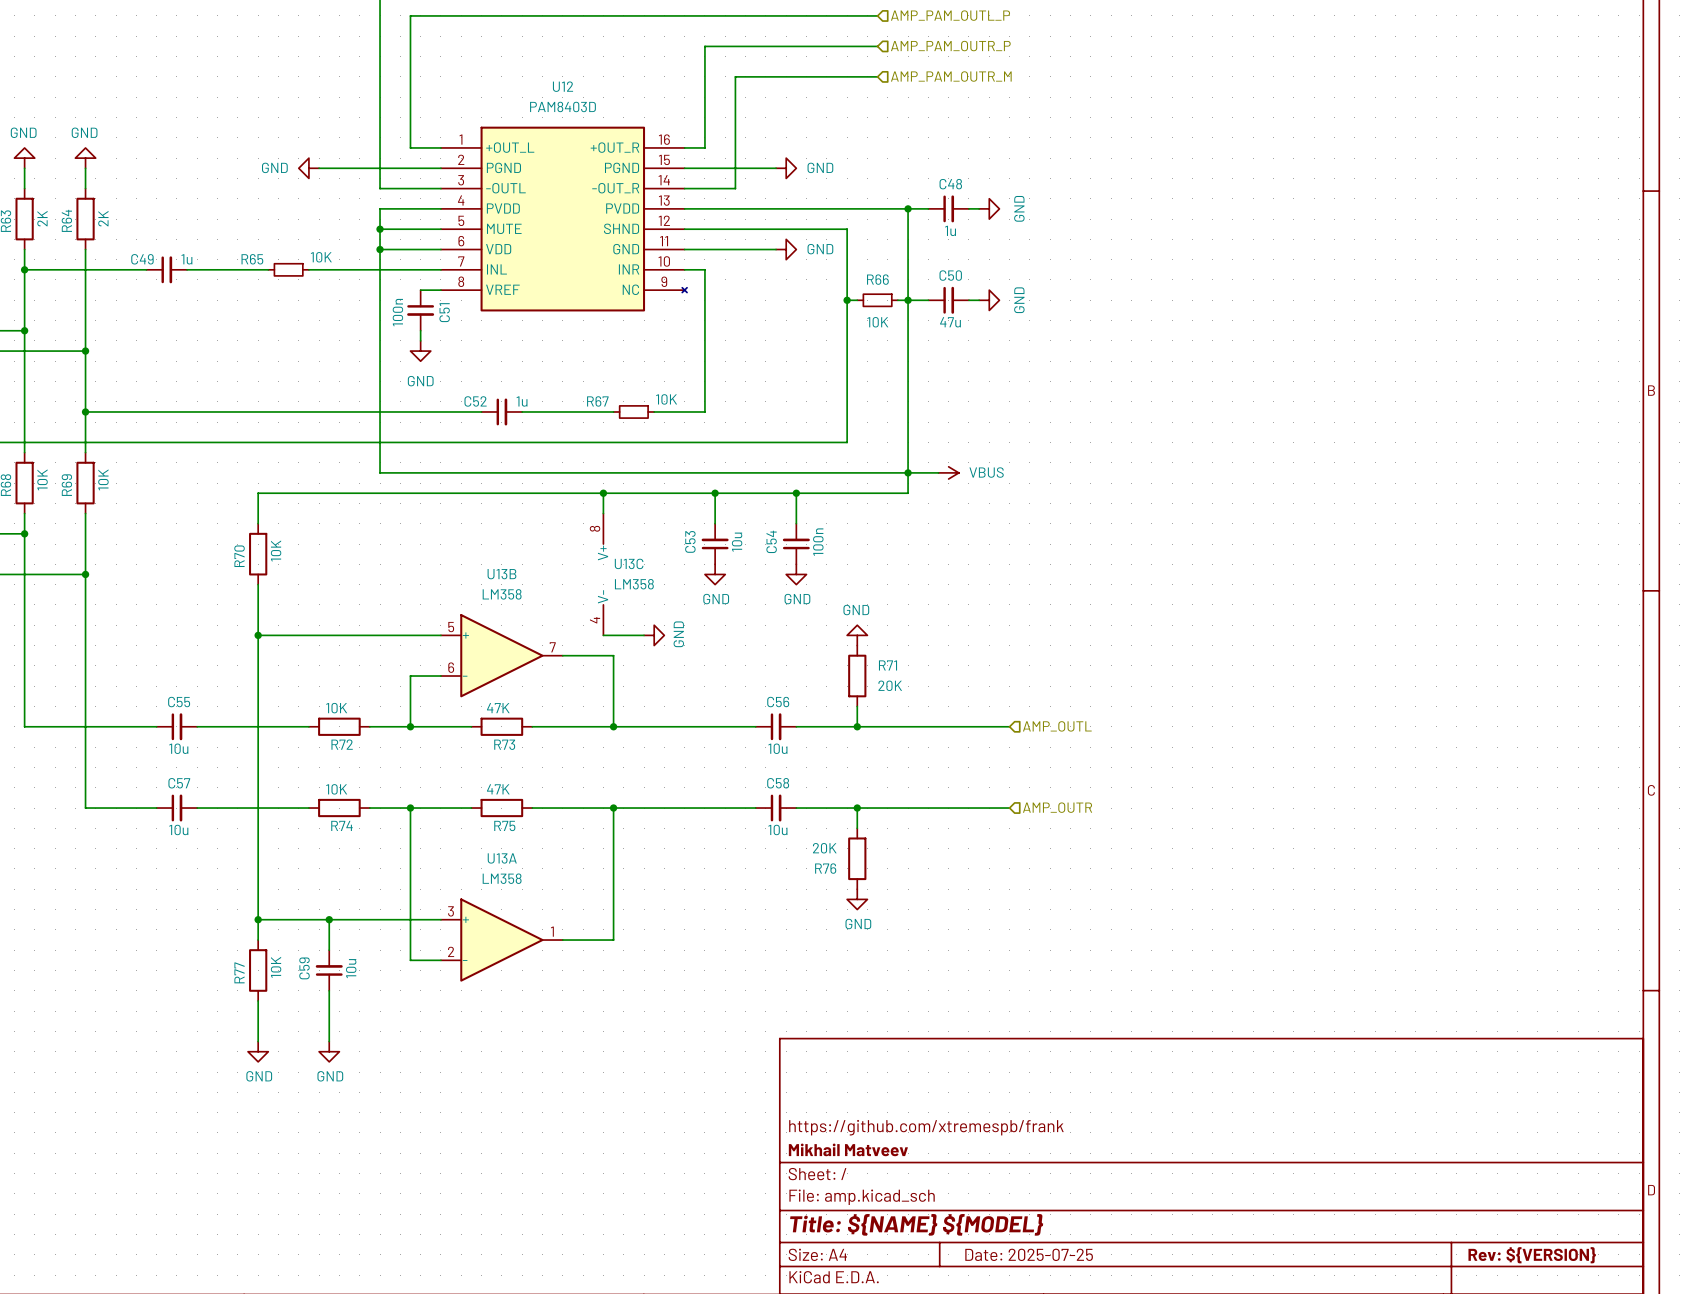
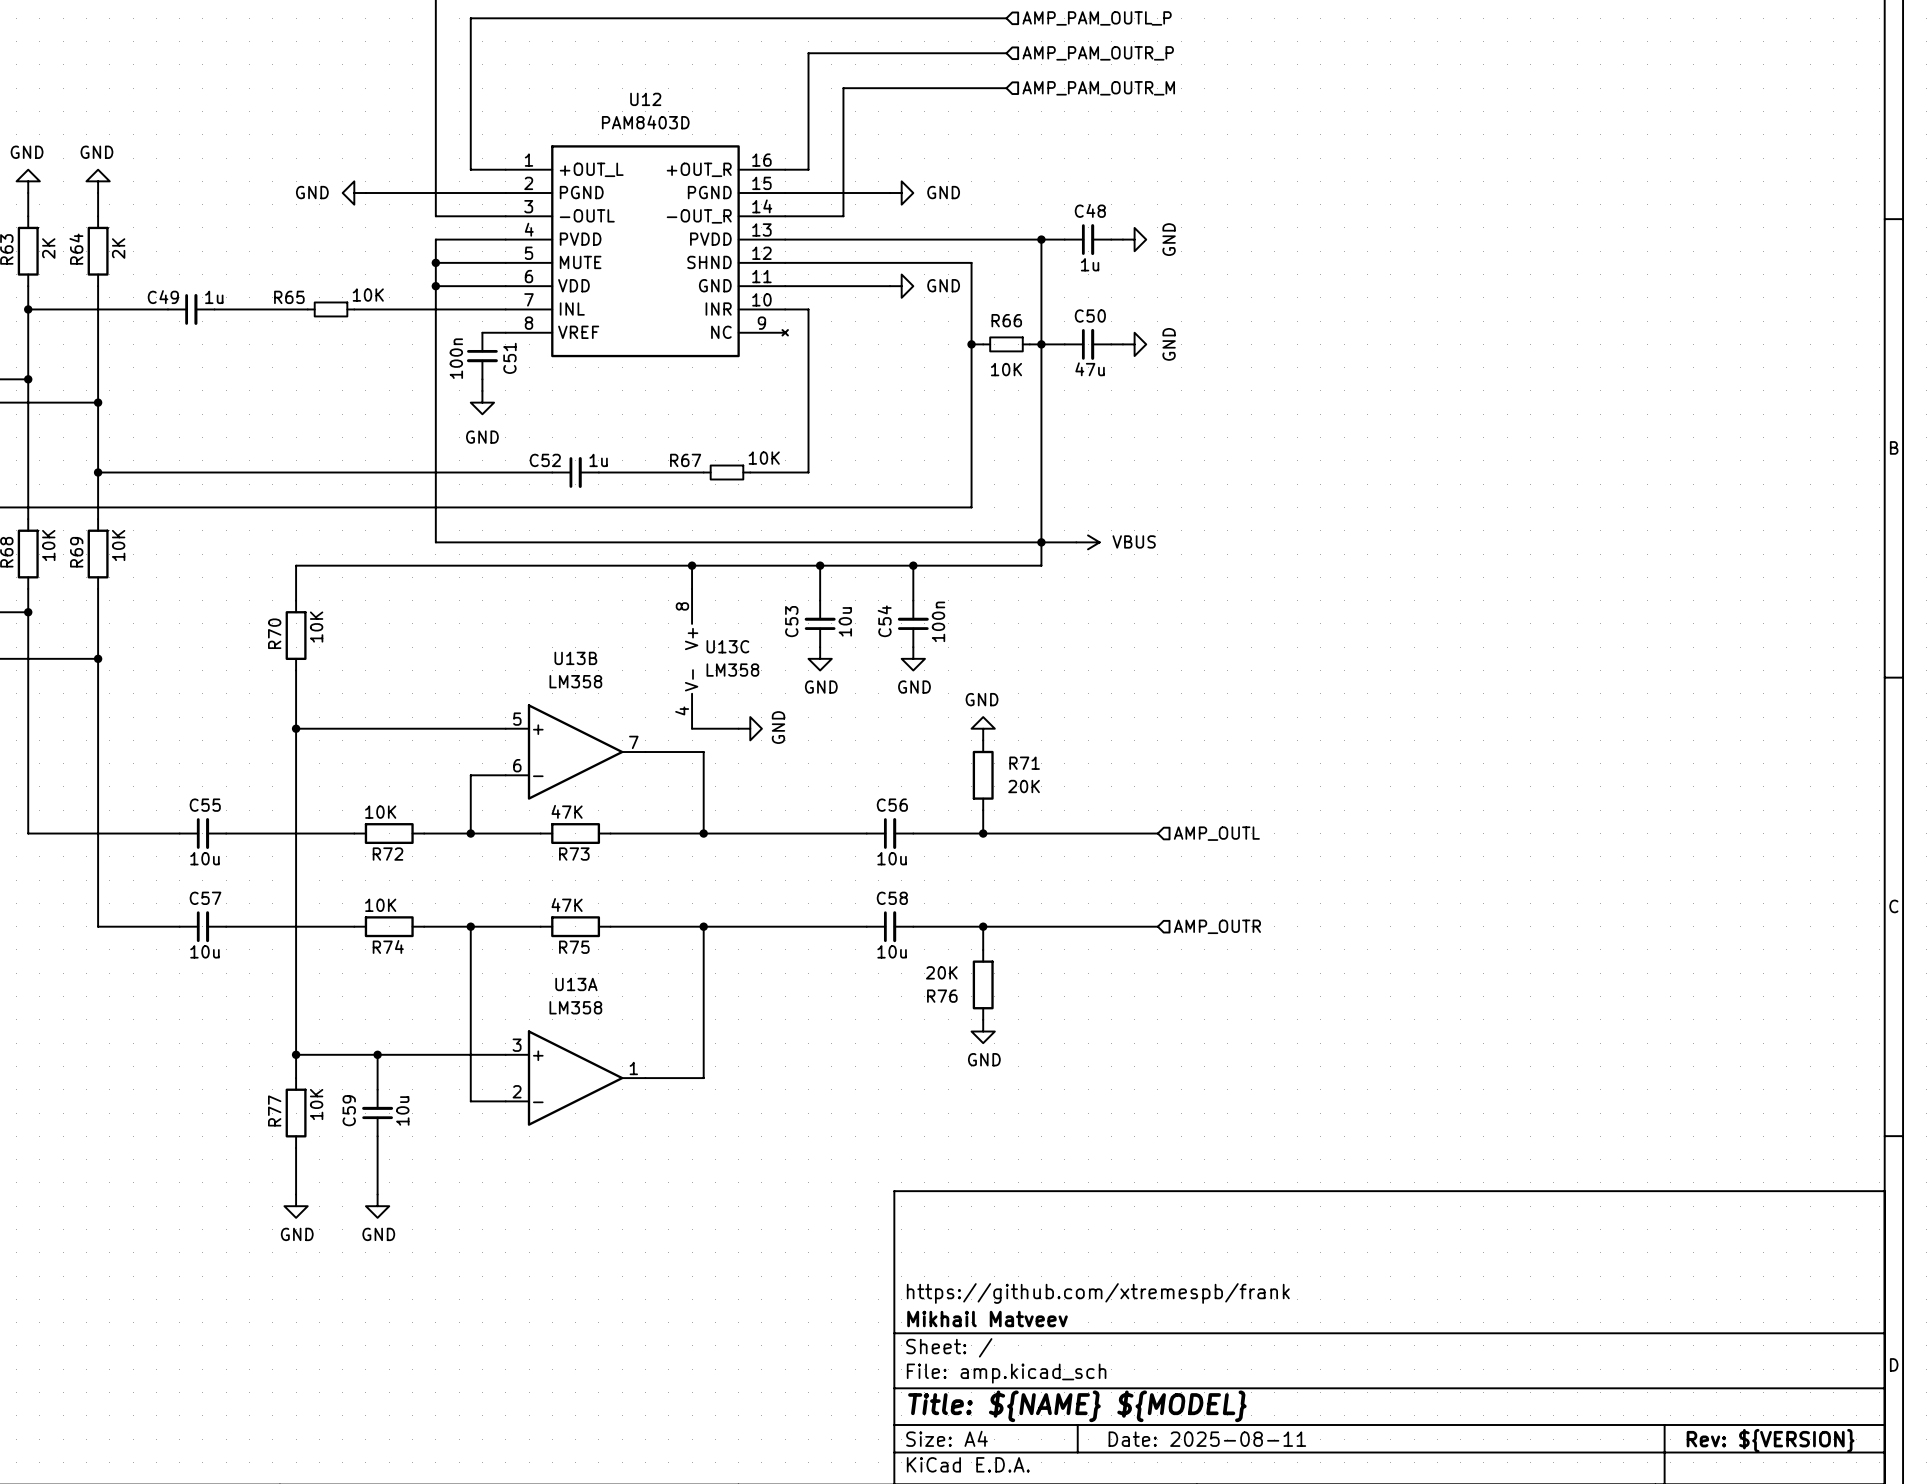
title block: Date: 2025-07-25 (1029, 1254) -> Date: 2025-08-11 (1207, 1439)

